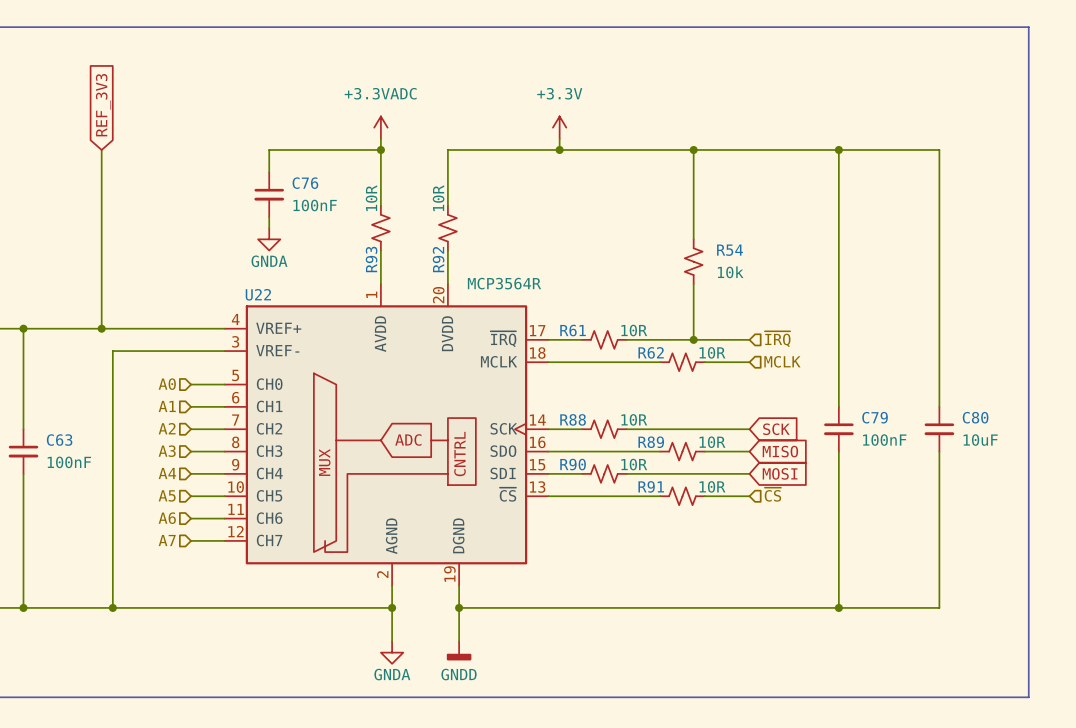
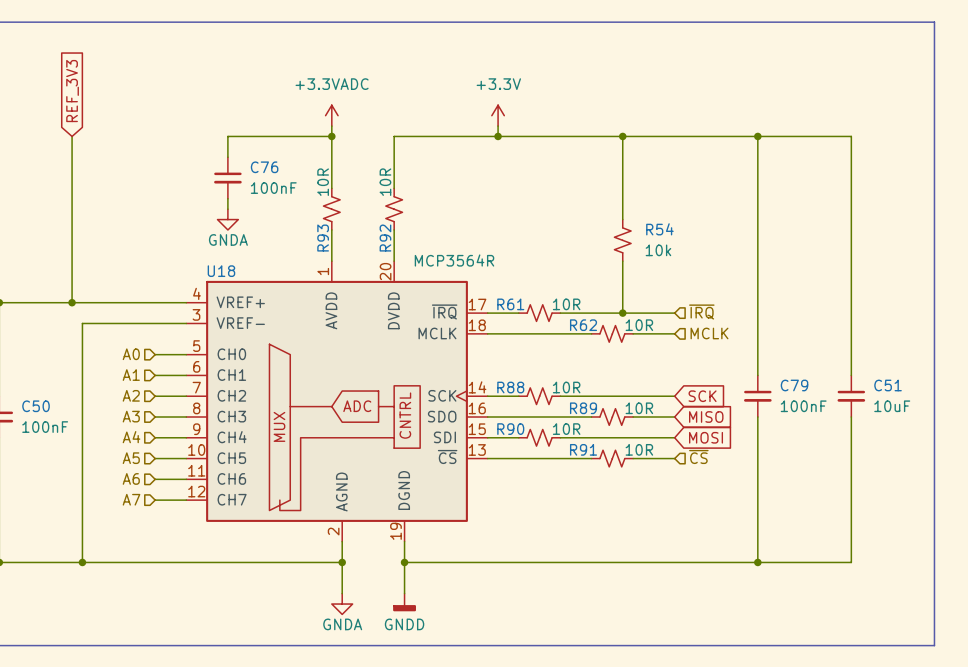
U22 name: U22 (258, 294) -> U18 (221, 271)
C80 name: C80 (975, 417) -> C51 (888, 385)
C63 name: C63 (59, 440) -> C50 (36, 406)

